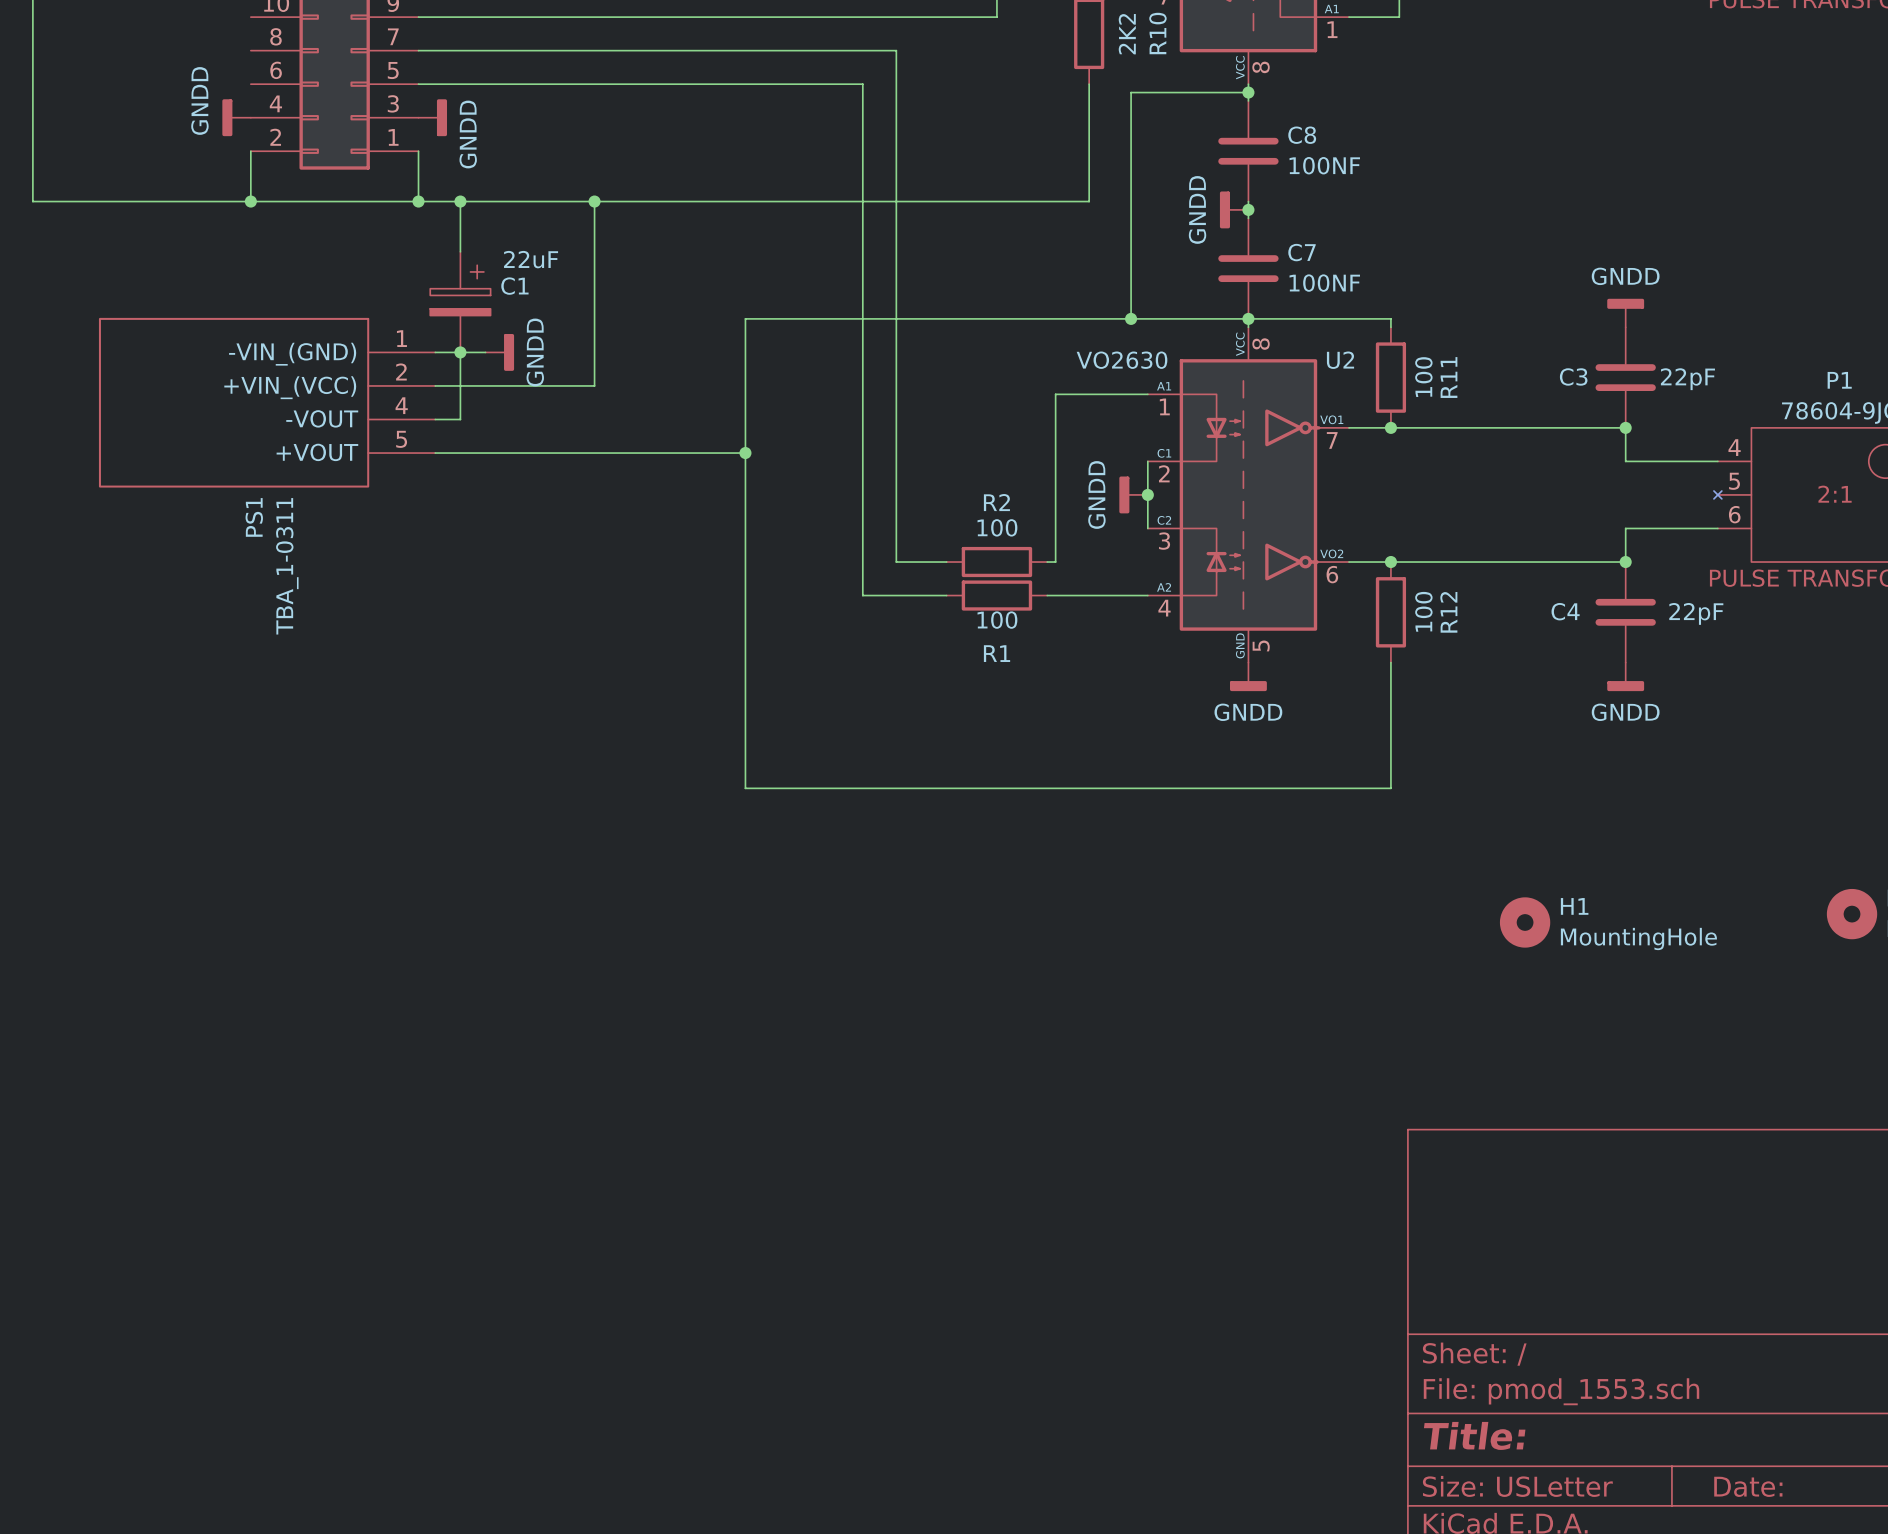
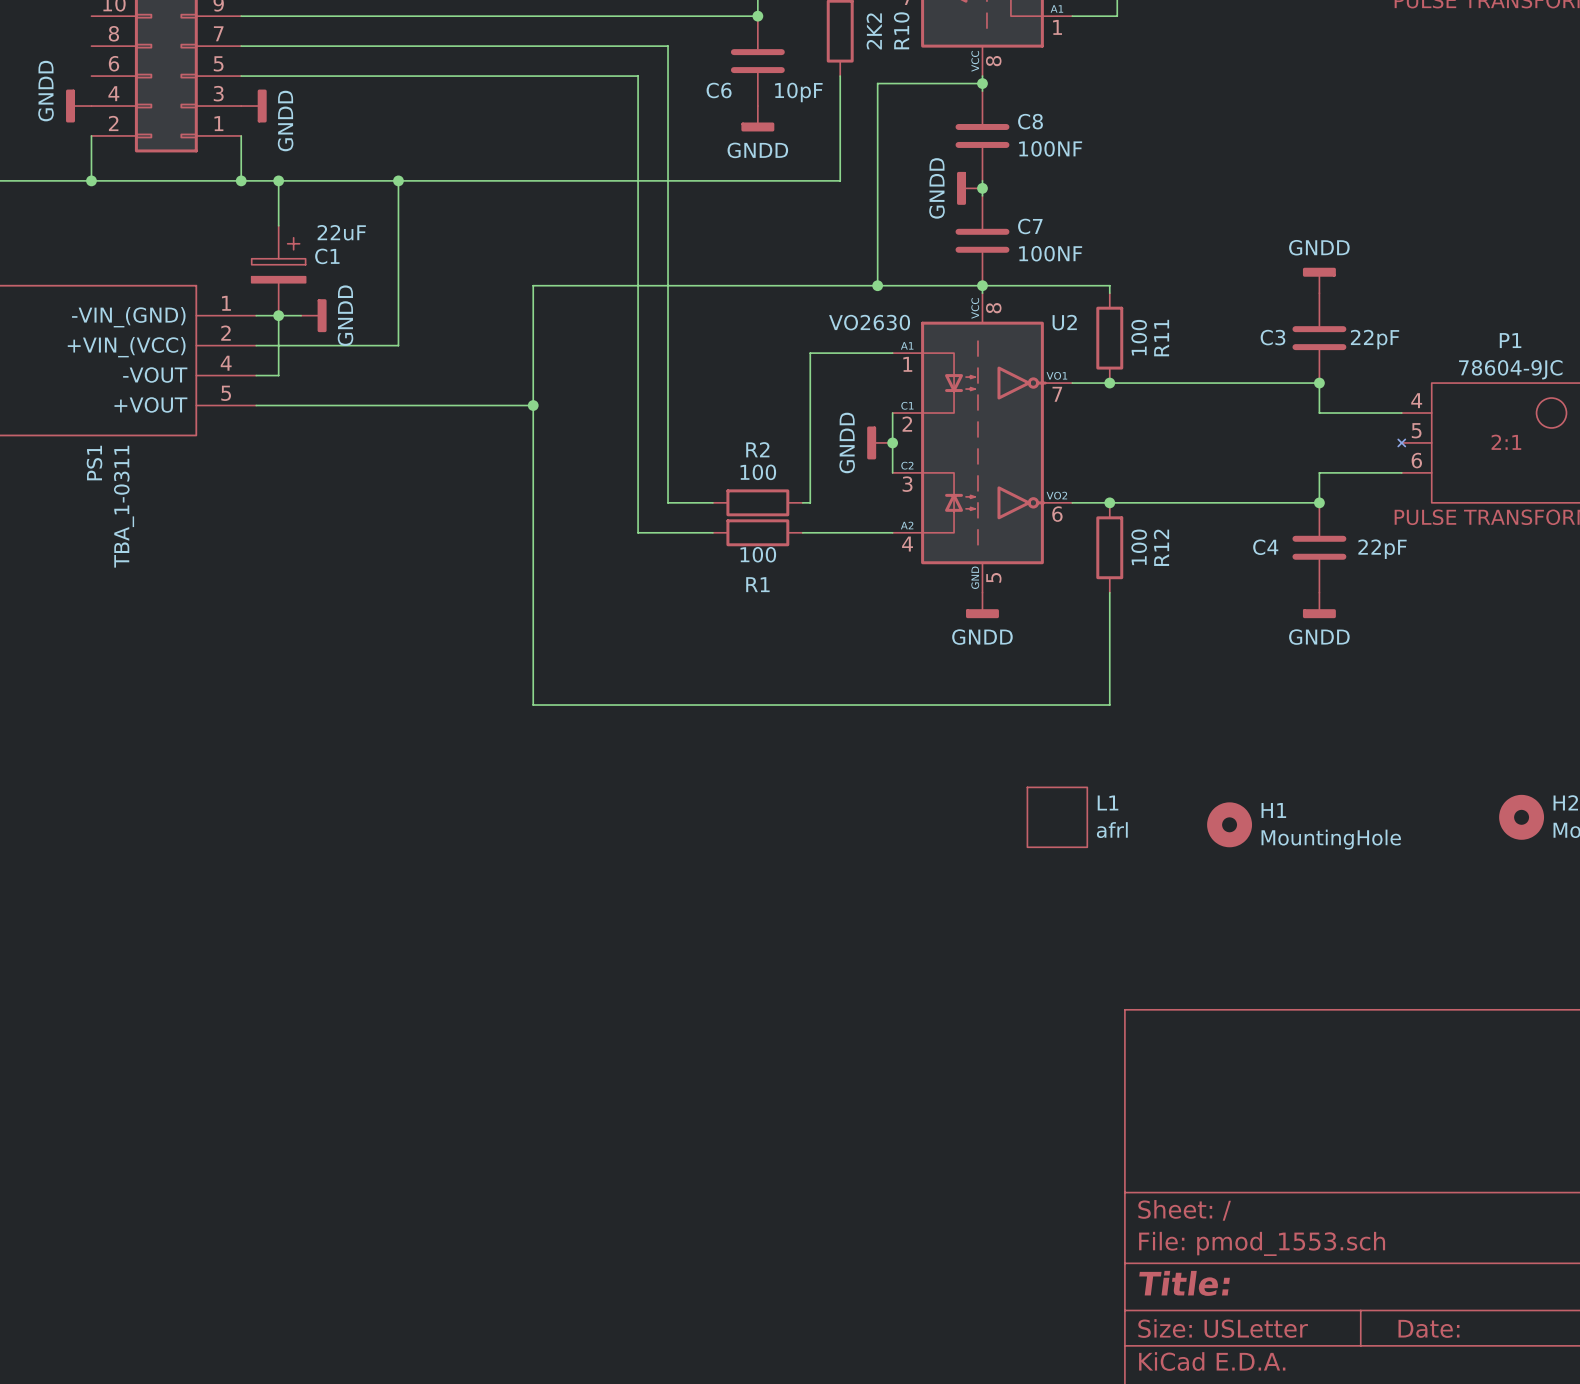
junction: none -> (757, 16)
C6: none -> 10pF (757, 61)
power symbol: none -> GNDD (757, 118)
L1: none -> afrl (1057, 817)

